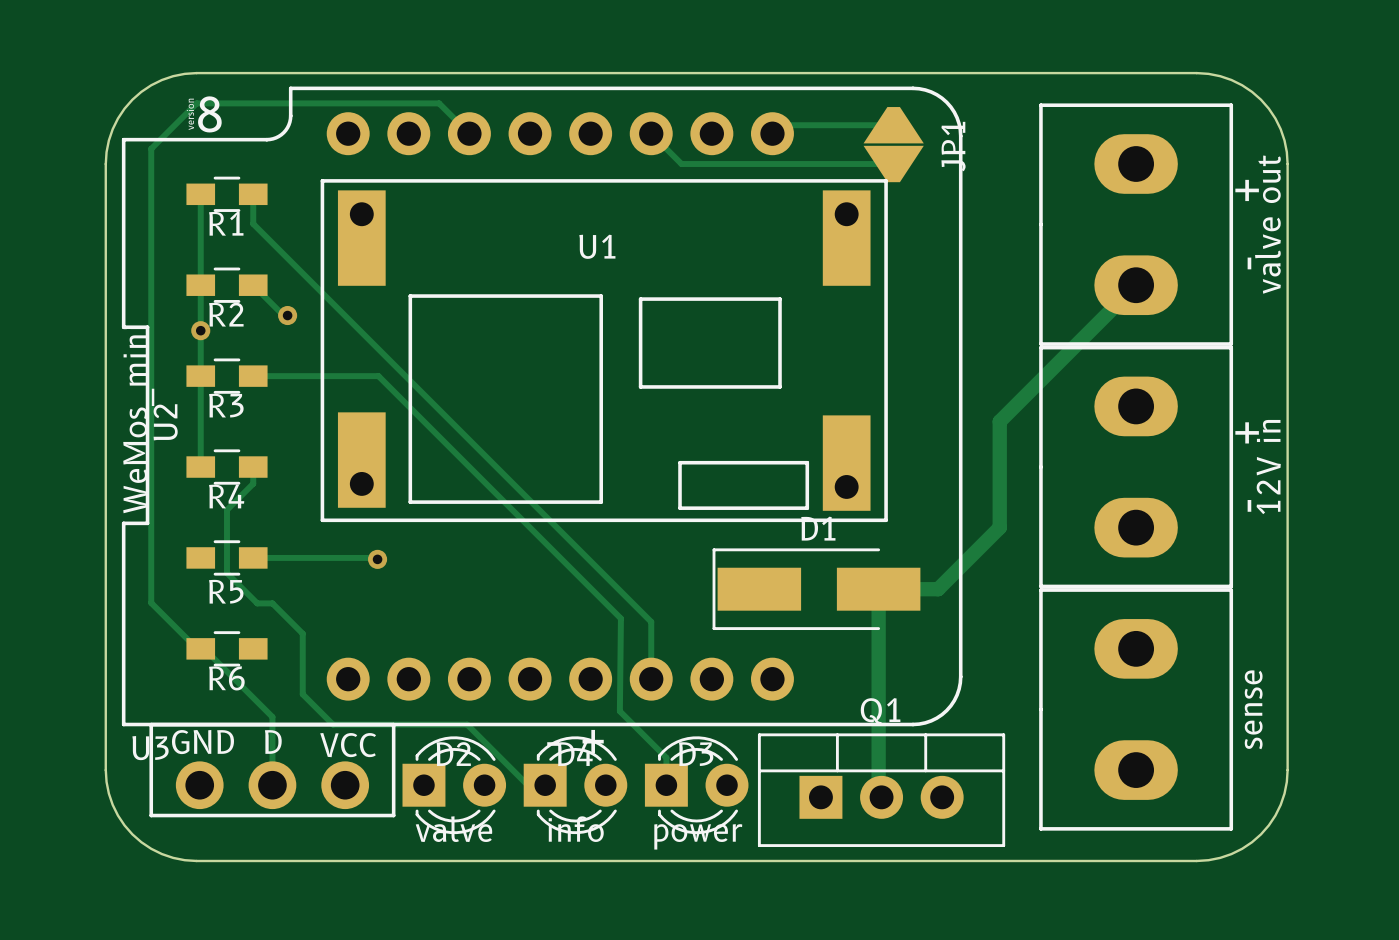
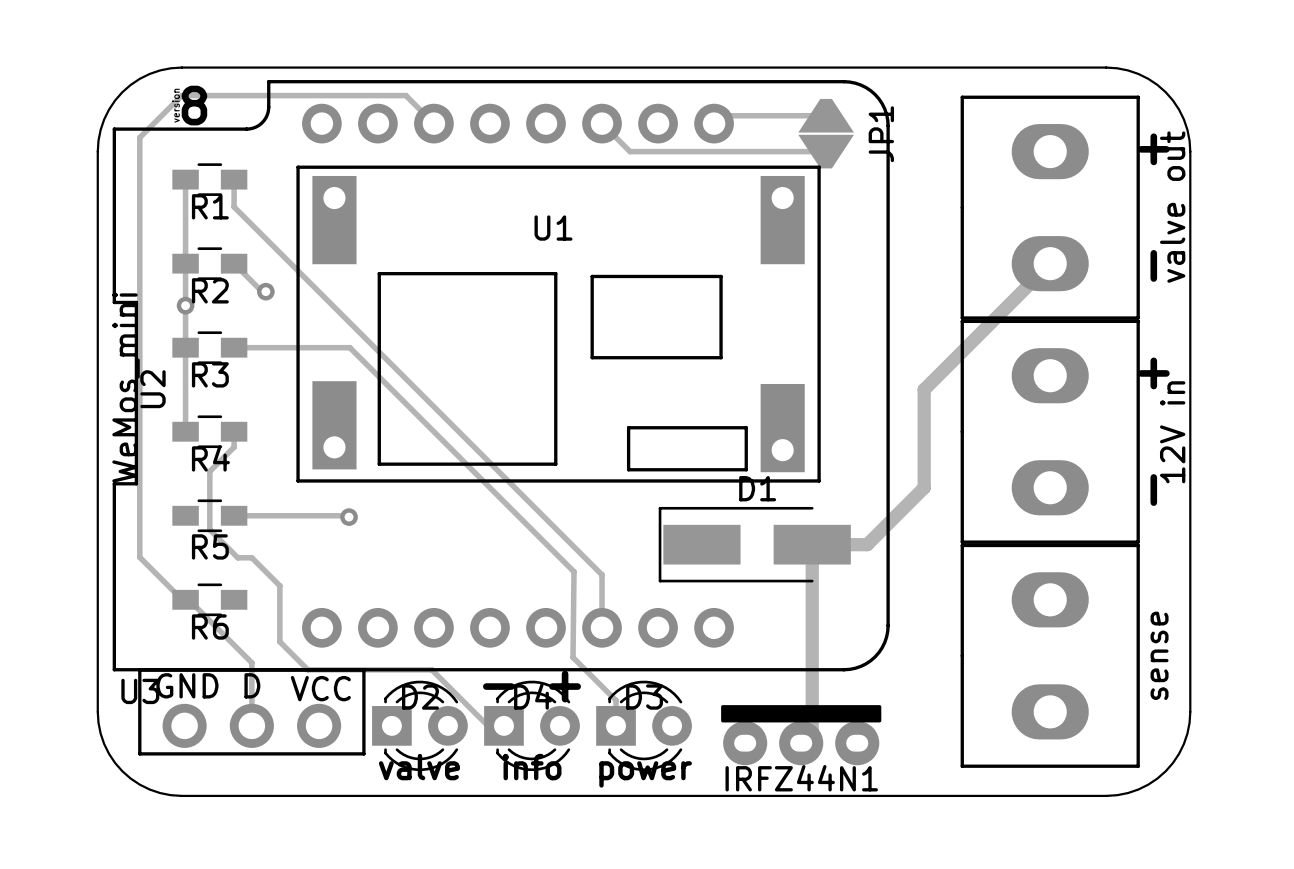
Q1: (881, 790) -> none
IRFZ44N1: none -> (801, 735)

